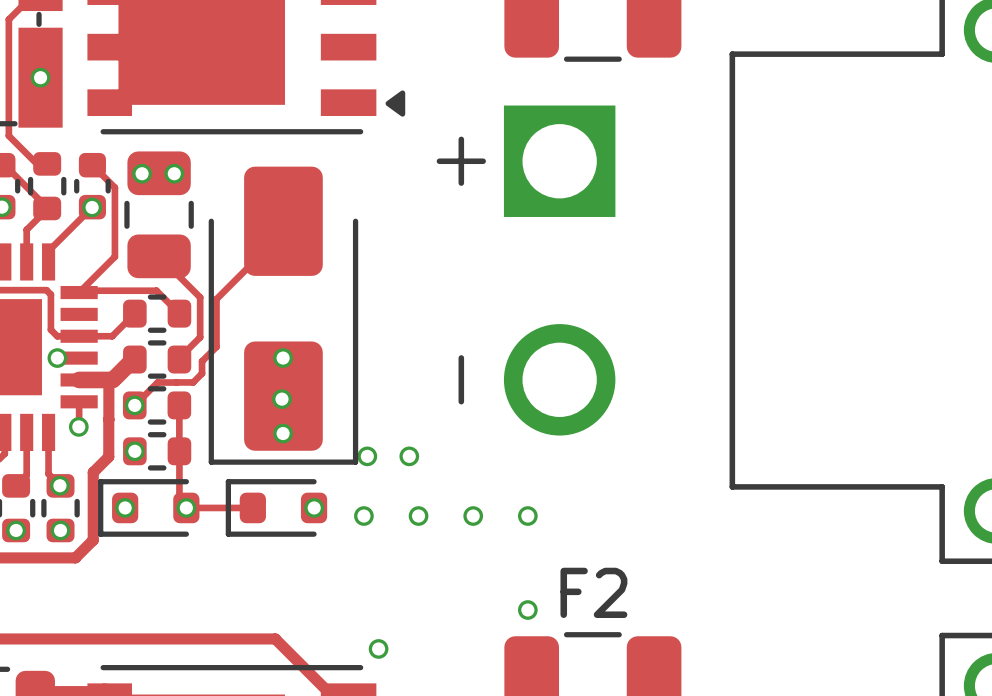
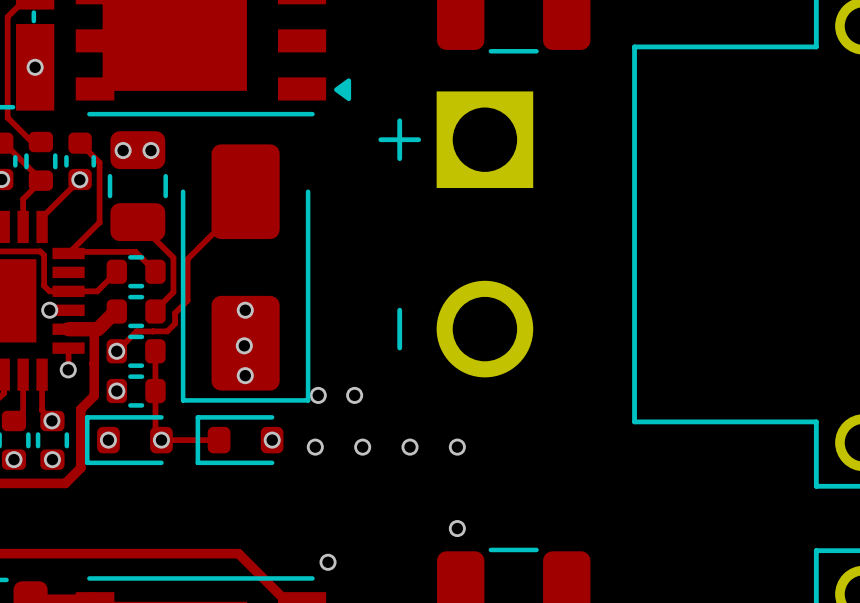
F2 name: F2 (593, 592) -> none

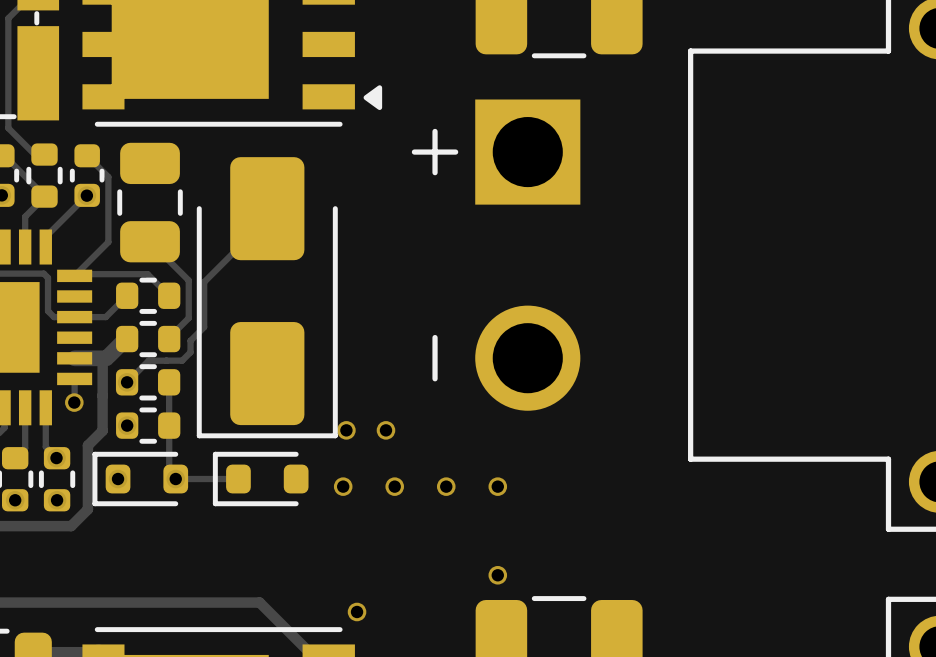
via: (35, 67) -> none
via: (123, 150) -> none
via: (151, 150) -> none
via: (49, 310) -> none
via: (245, 310) -> none
via: (244, 345) -> none
via: (245, 375) -> none
via: (272, 440) -> none

